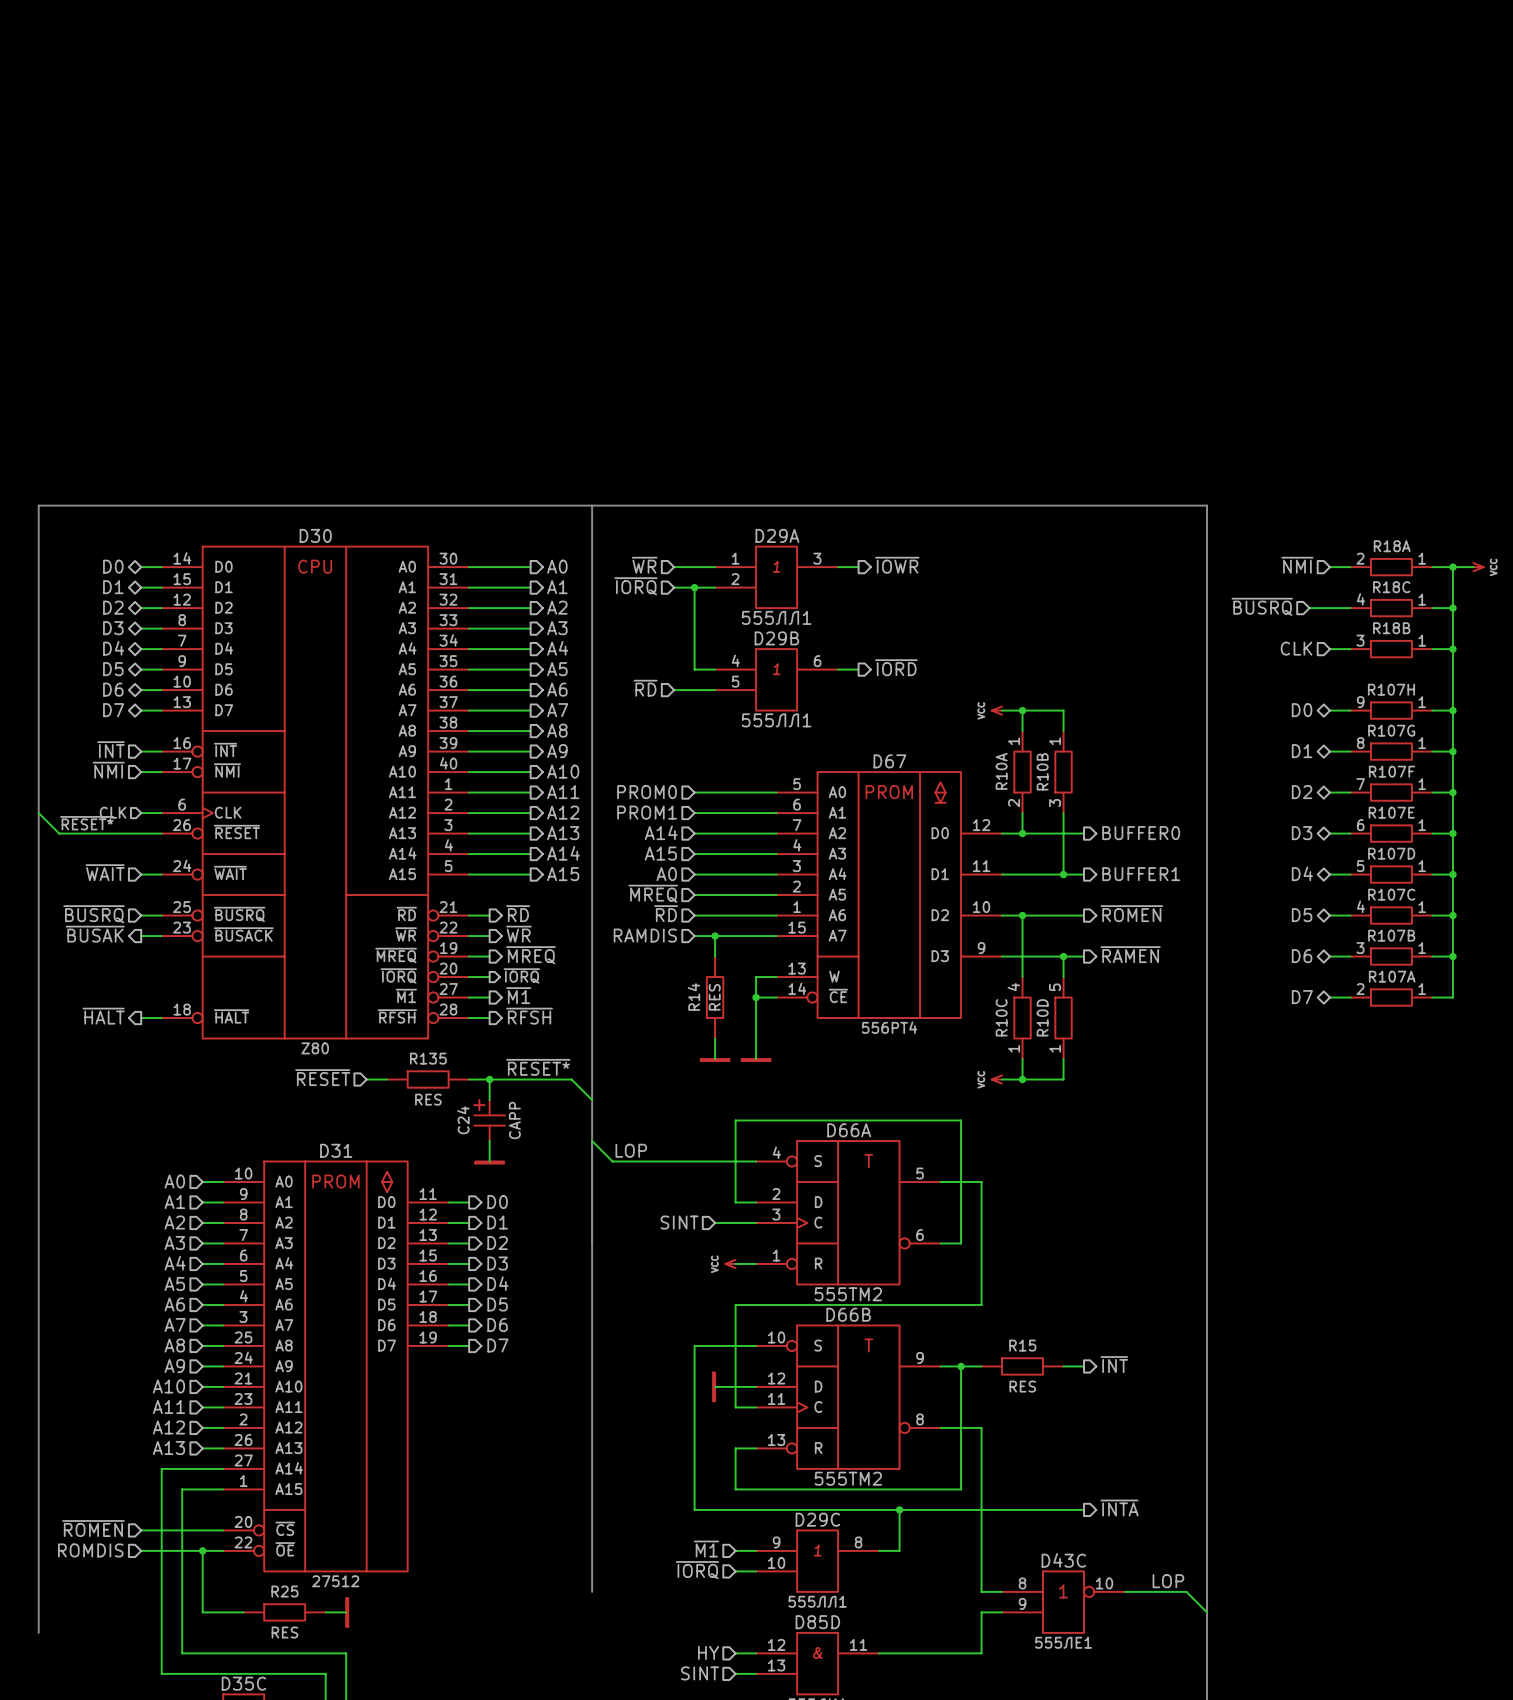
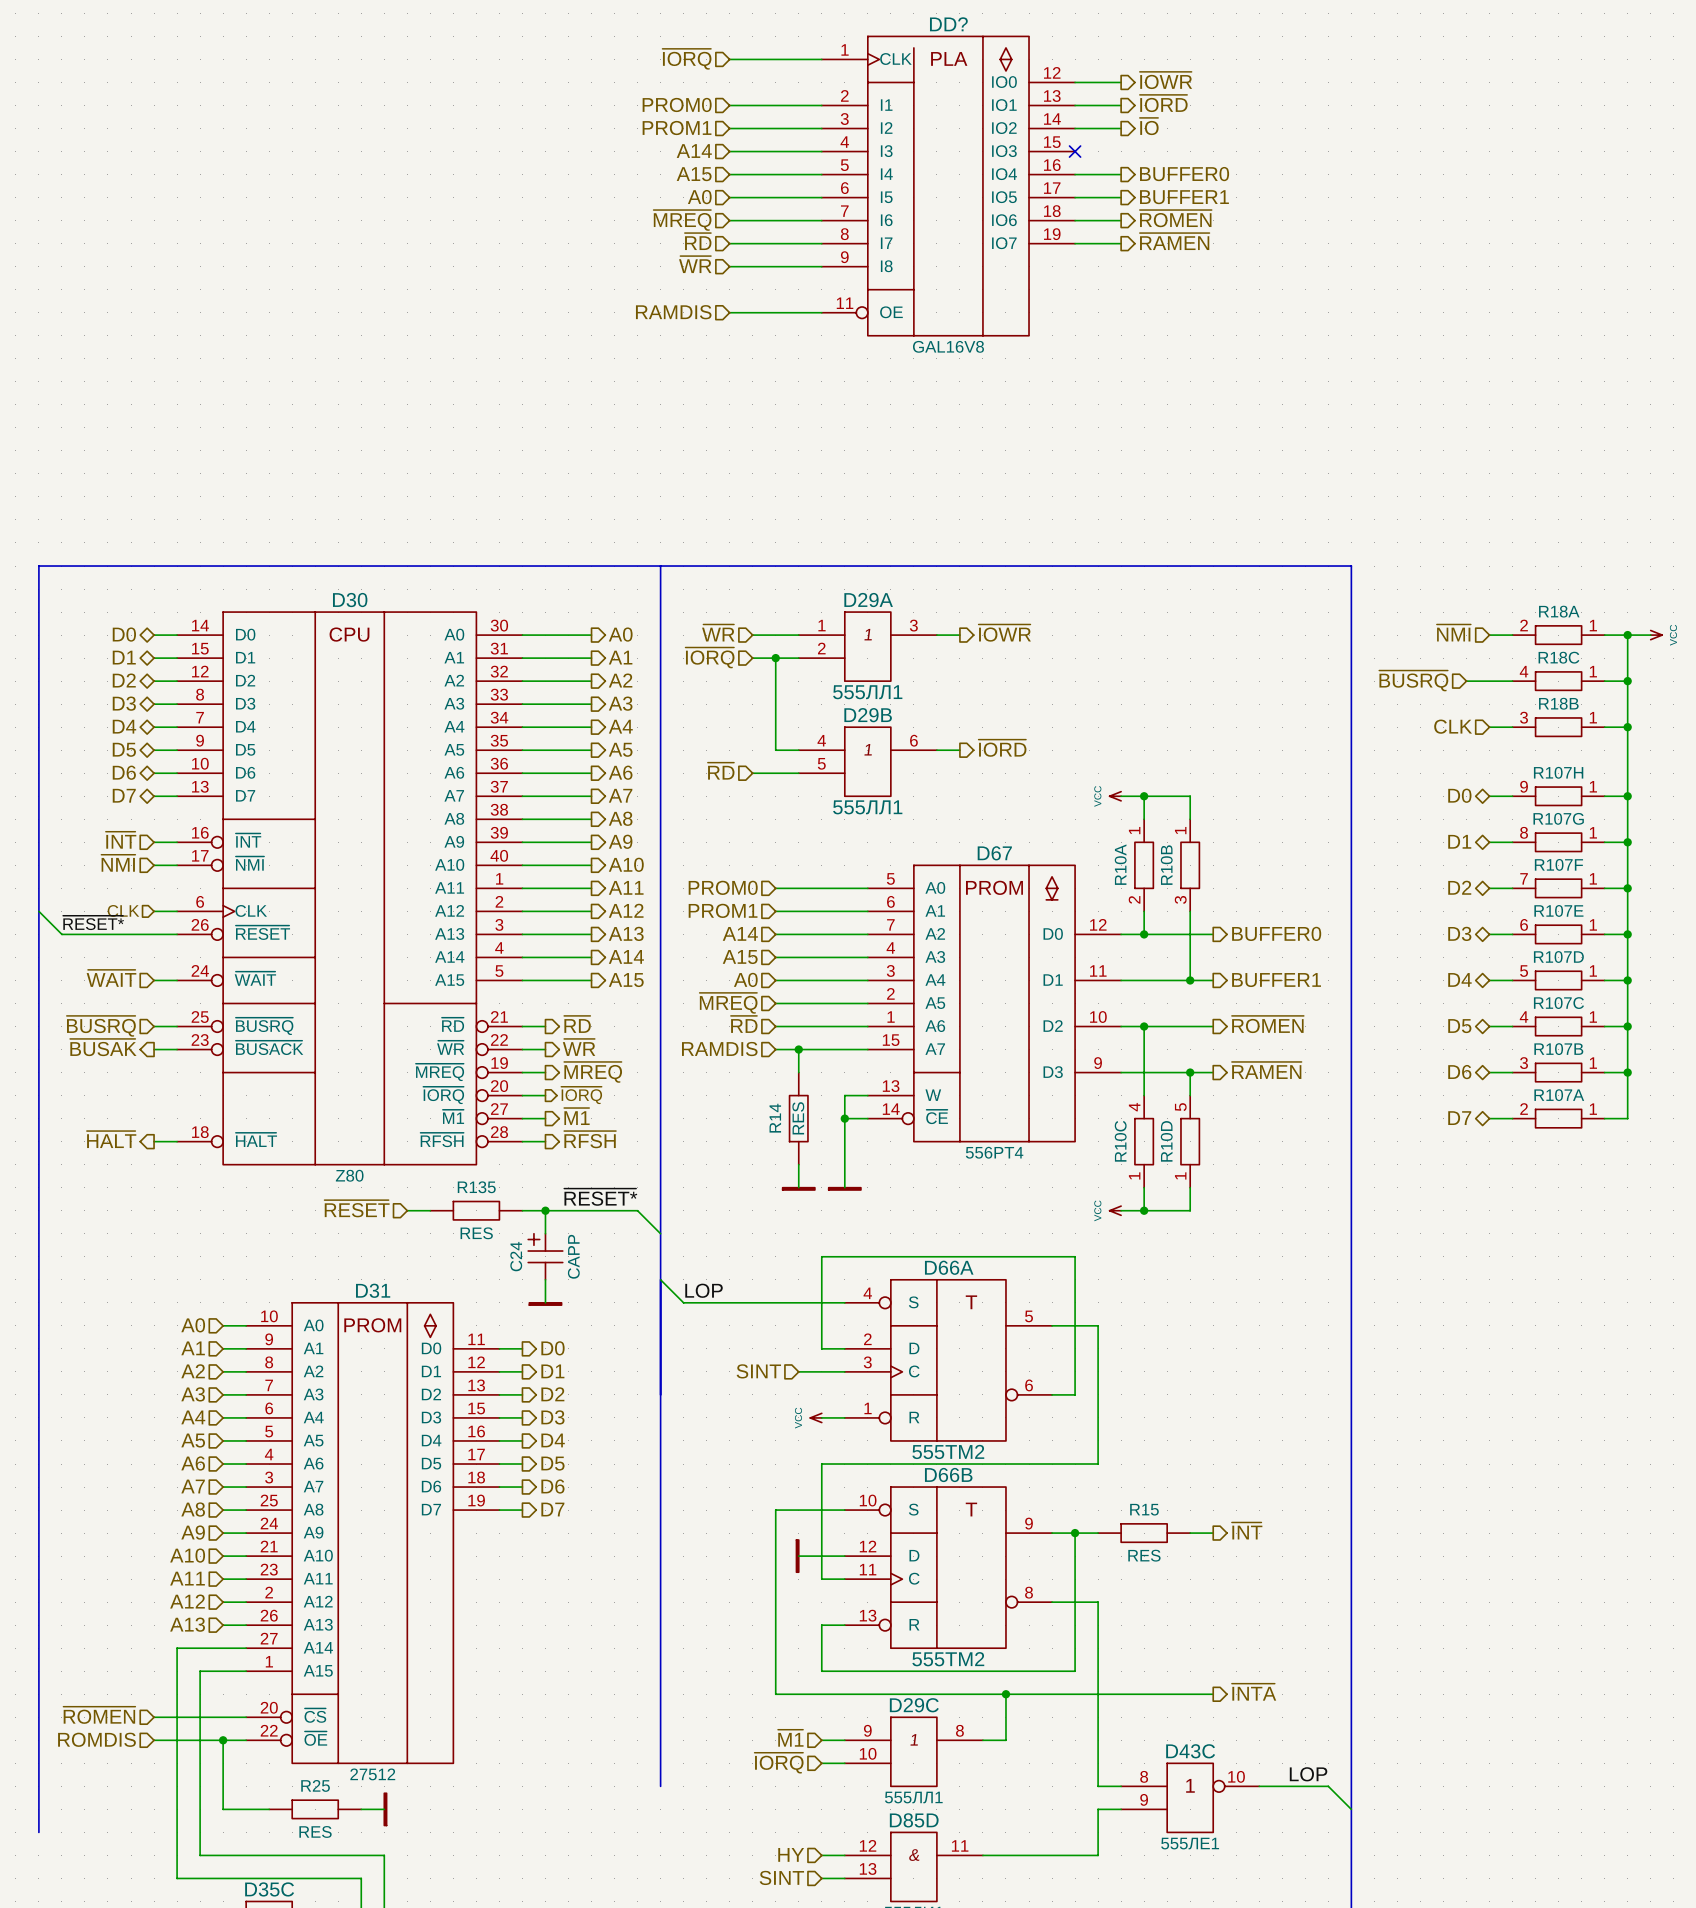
hierarchical label: none -> ~{IORQ} (686, 59)
wire: none -> (729, 59) (821, 59)
hierarchical label: none -> ~{IOWR} (1165, 80)
wire: none -> (1075, 82) (1121, 82)
hierarchical label: none -> ~{IORD} (1163, 103)
hierarchical label: none -> PROM0 (677, 104)
wire: none -> (729, 105) (821, 105)
wire: none -> (1075, 105) (1121, 105)
hierarchical label: none -> ~{IO} (1149, 126)
hierarchical label: none -> PROM1 (677, 128)
wire: none -> (729, 128) (821, 128)
wire: none -> (1075, 128) (1121, 128)
hierarchical label: none -> A14 (694, 151)
wire: none -> (729, 151) (821, 151)
no-connect mark: none -> (1075, 151)
hierarchical label: none -> A15 (694, 174)
hierarchical label: none -> BUFFER0 (1184, 174)
wire: none -> (729, 174) (821, 174)
wire: none -> (1075, 174) (1121, 174)
DD?: none -> GAL16V8 (948, 186)
hierarchical label: none -> A0 (699, 197)
wire: none -> (729, 197) (821, 197)
wire: none -> (1075, 197) (1121, 197)
hierarchical label: none -> BUFFER1 (1184, 197)
hierarchical label: none -> ~{MREQ} (682, 220)
hierarchical label: none -> ~{ROMEN} (1175, 218)
wire: none -> (729, 220) (821, 220)
wire: none -> (1075, 220) (1121, 220)
hierarchical label: none -> ~{RD} (698, 241)
hierarchical label: none -> ~{RAMEN} (1174, 241)
wire: none -> (729, 243) (821, 243)
wire: none -> (1075, 243) (1121, 243)
hierarchical label: none -> ~{WR} (695, 264)
wire: none -> (729, 266) (821, 266)
hierarchical label: none -> RAMDIS (673, 312)
wire: none -> (729, 312) (821, 312)

